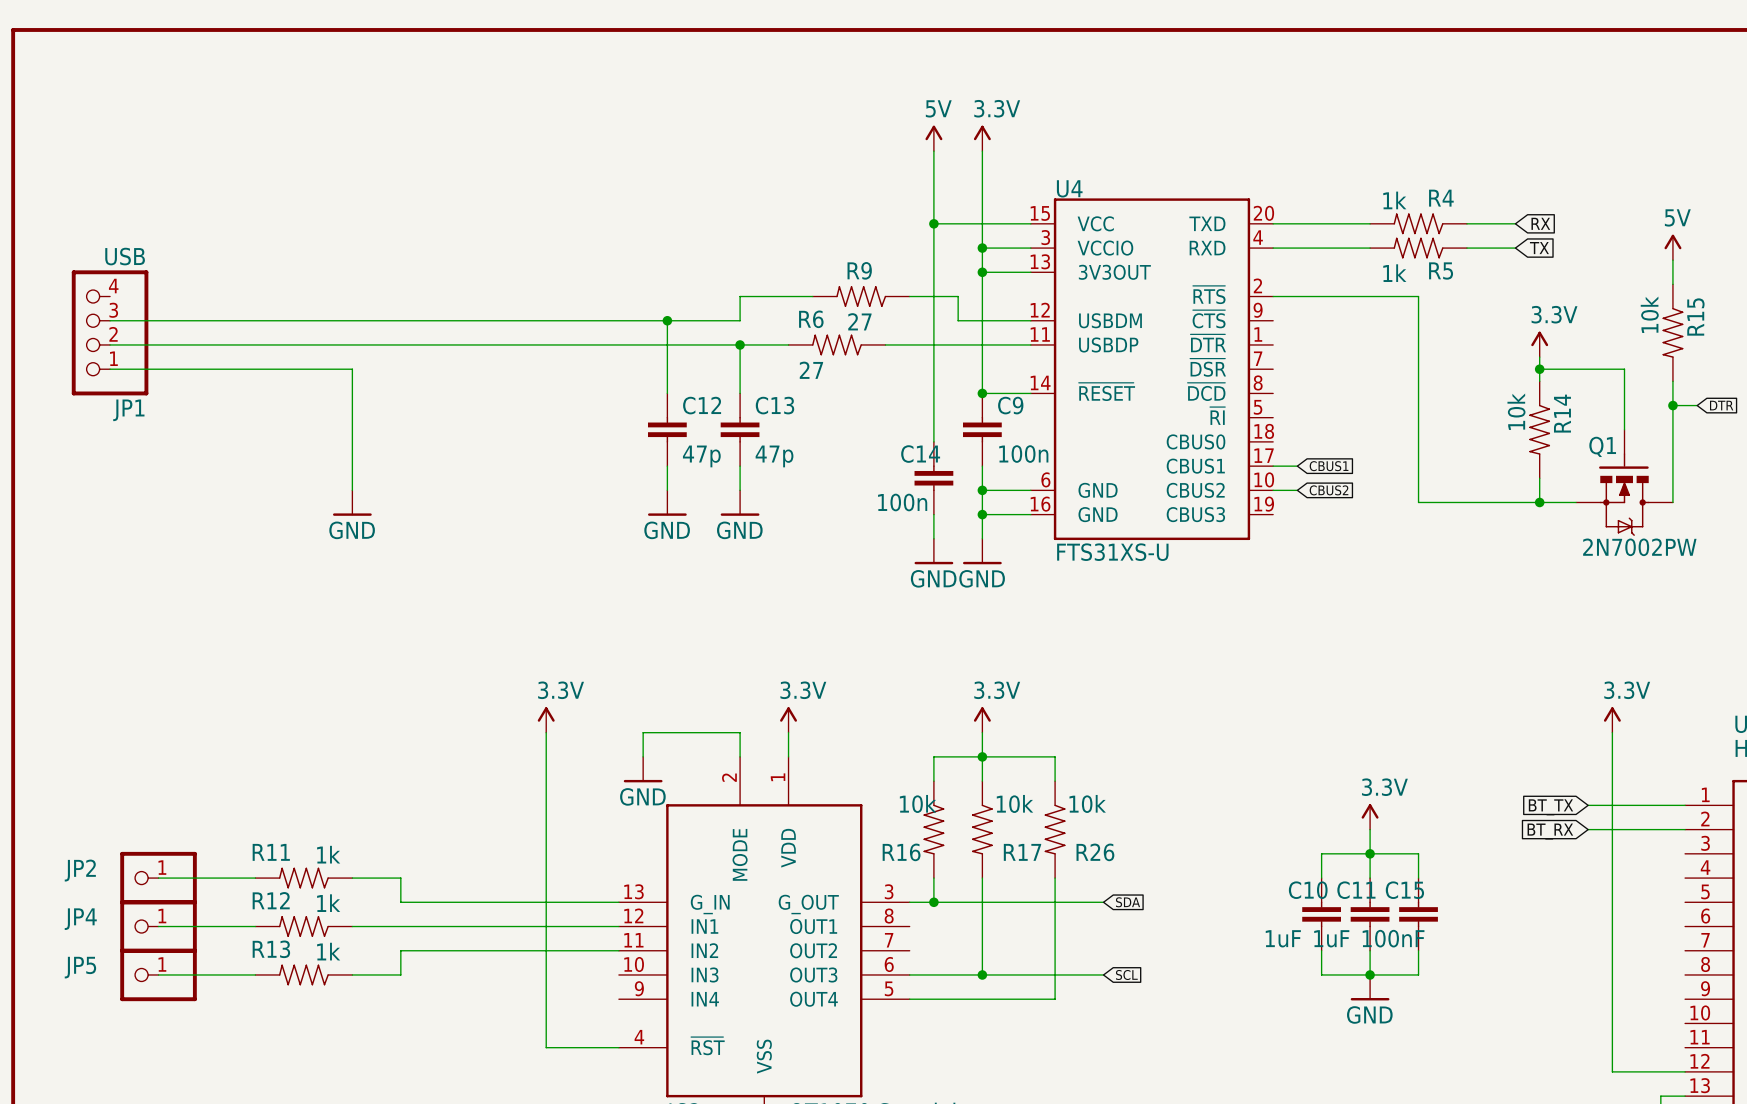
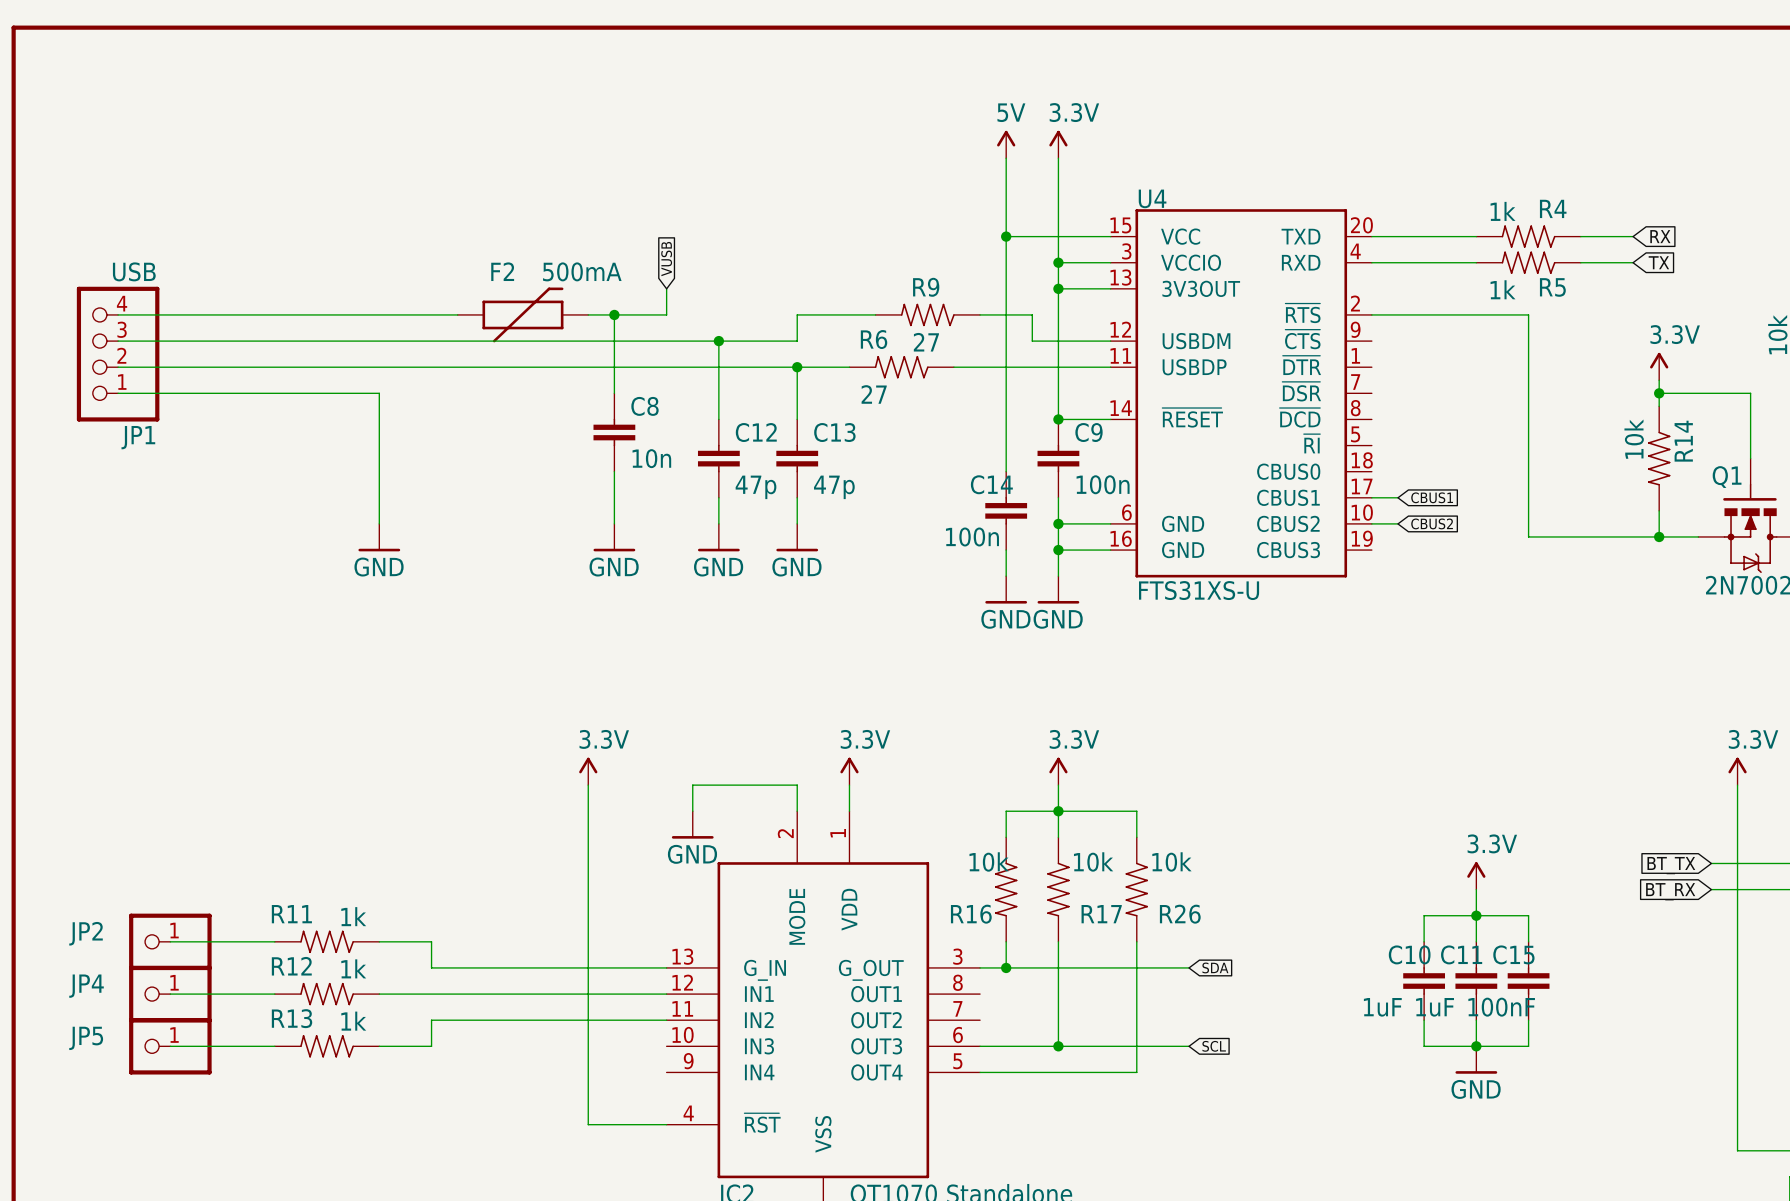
global label: none -> VUSB (666, 259)
wire: none -> (666, 288) (666, 314) (588, 314)
wire: none -> (118, 314) (457, 314)
F2: none -> 500mA (522, 314)
wire: none -> (614, 314) (614, 393)
junction: none -> (614, 314)
C8: none -> 10n (614, 432)
wire: none -> (614, 471) (614, 523)
power symbol: none -> GND (614, 537)

